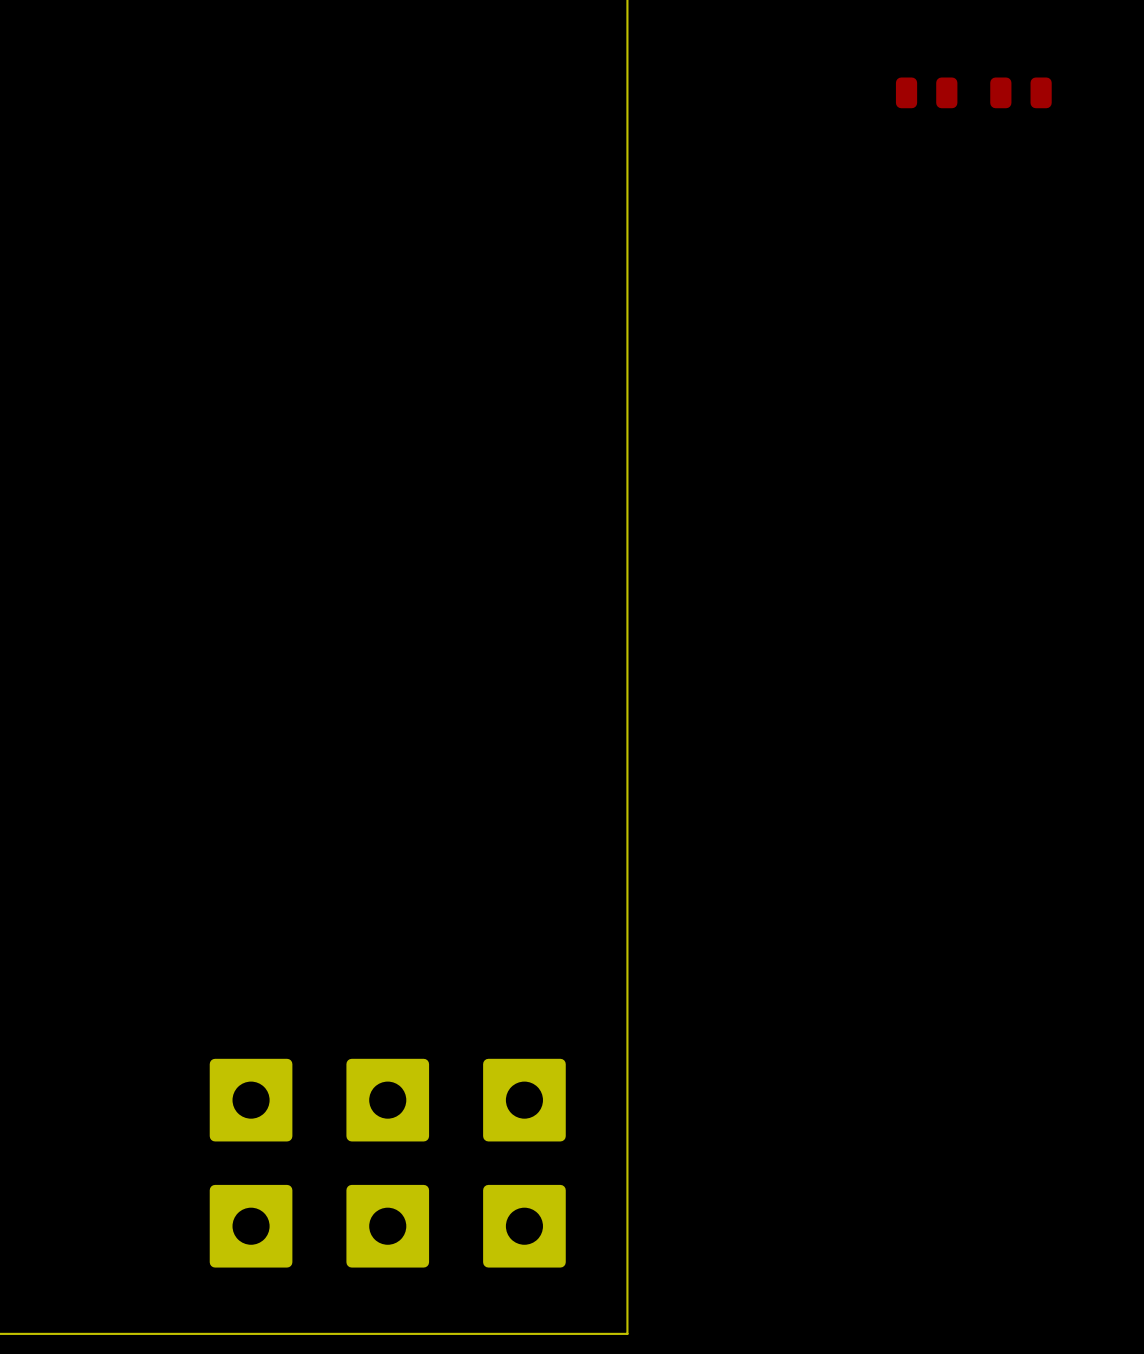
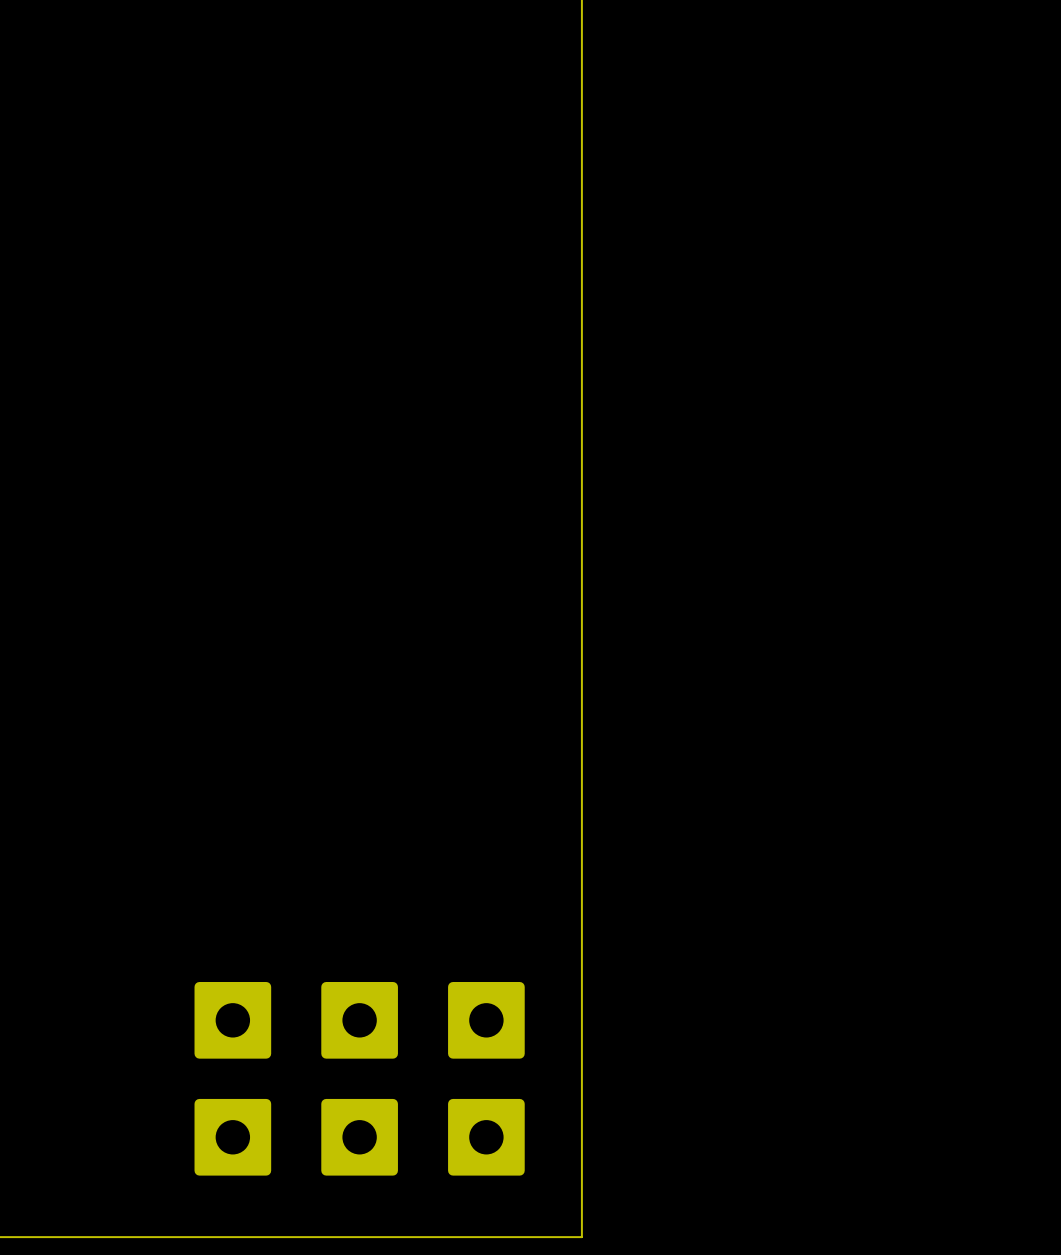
part: (926, 92) -> none
part: (1020, 92) -> none

